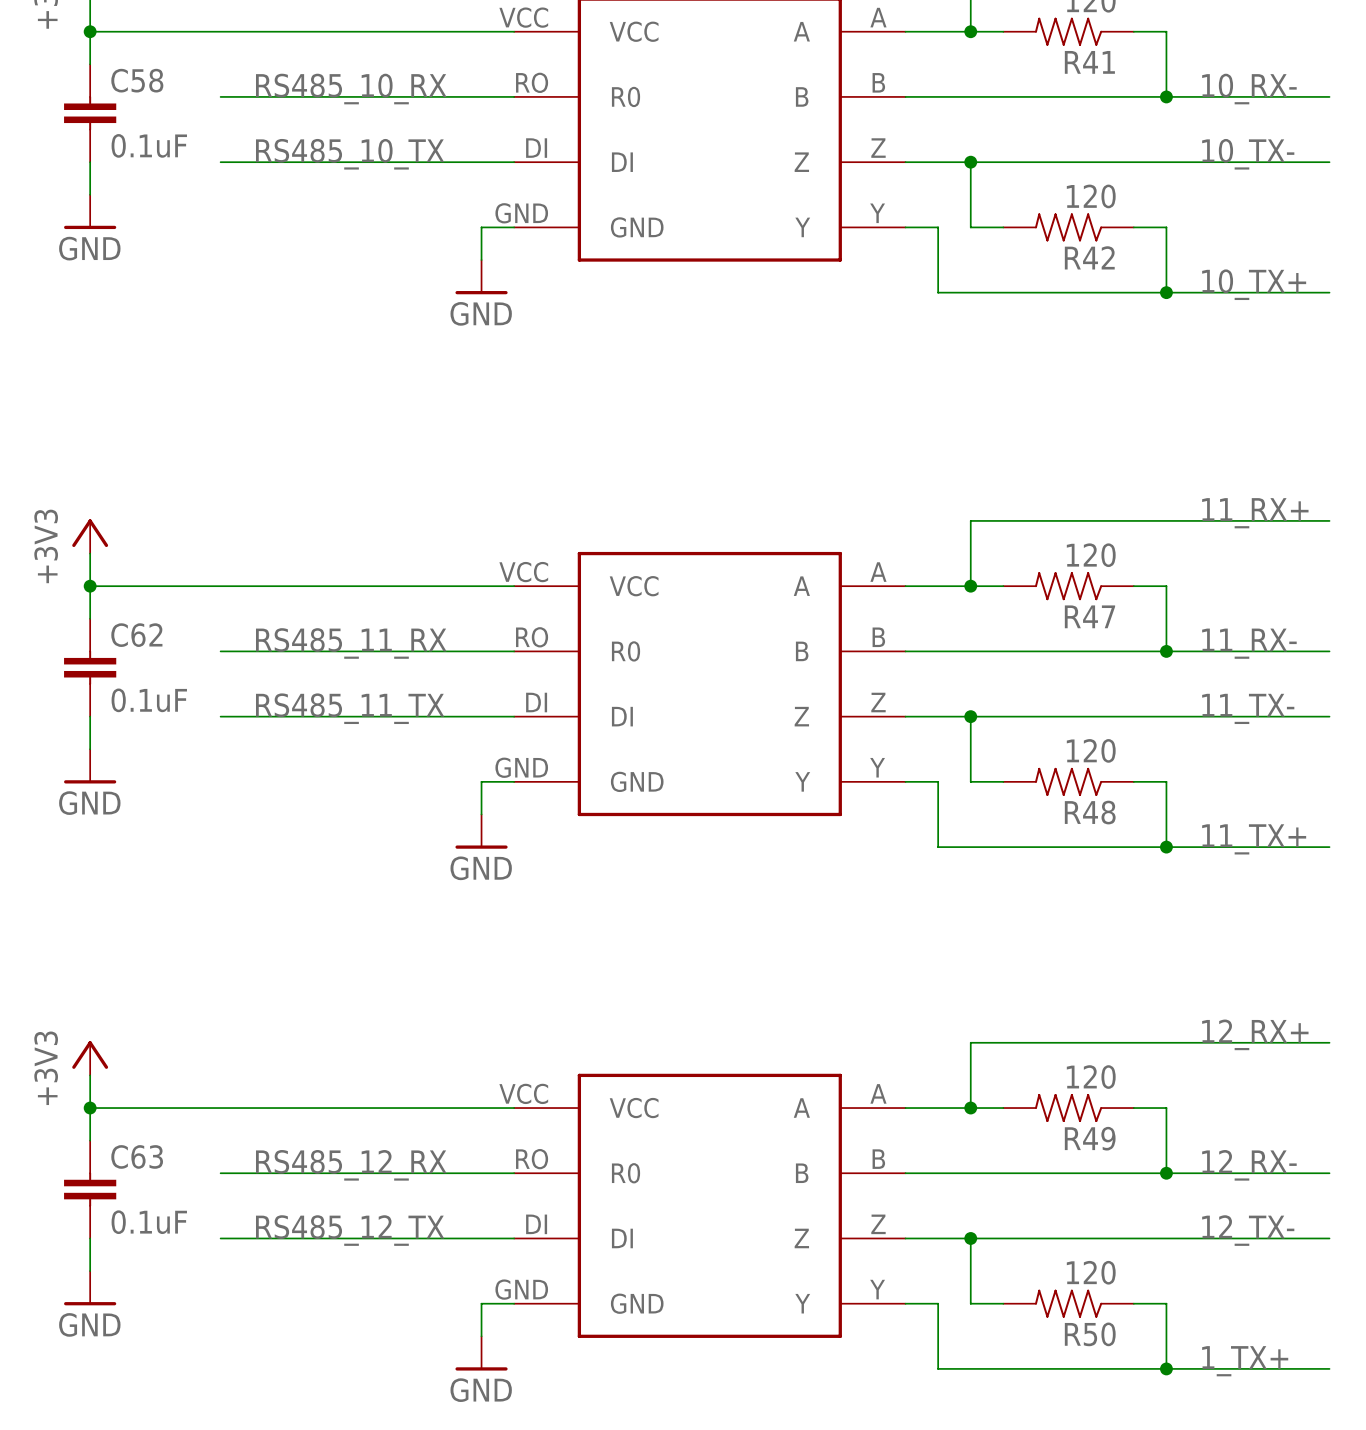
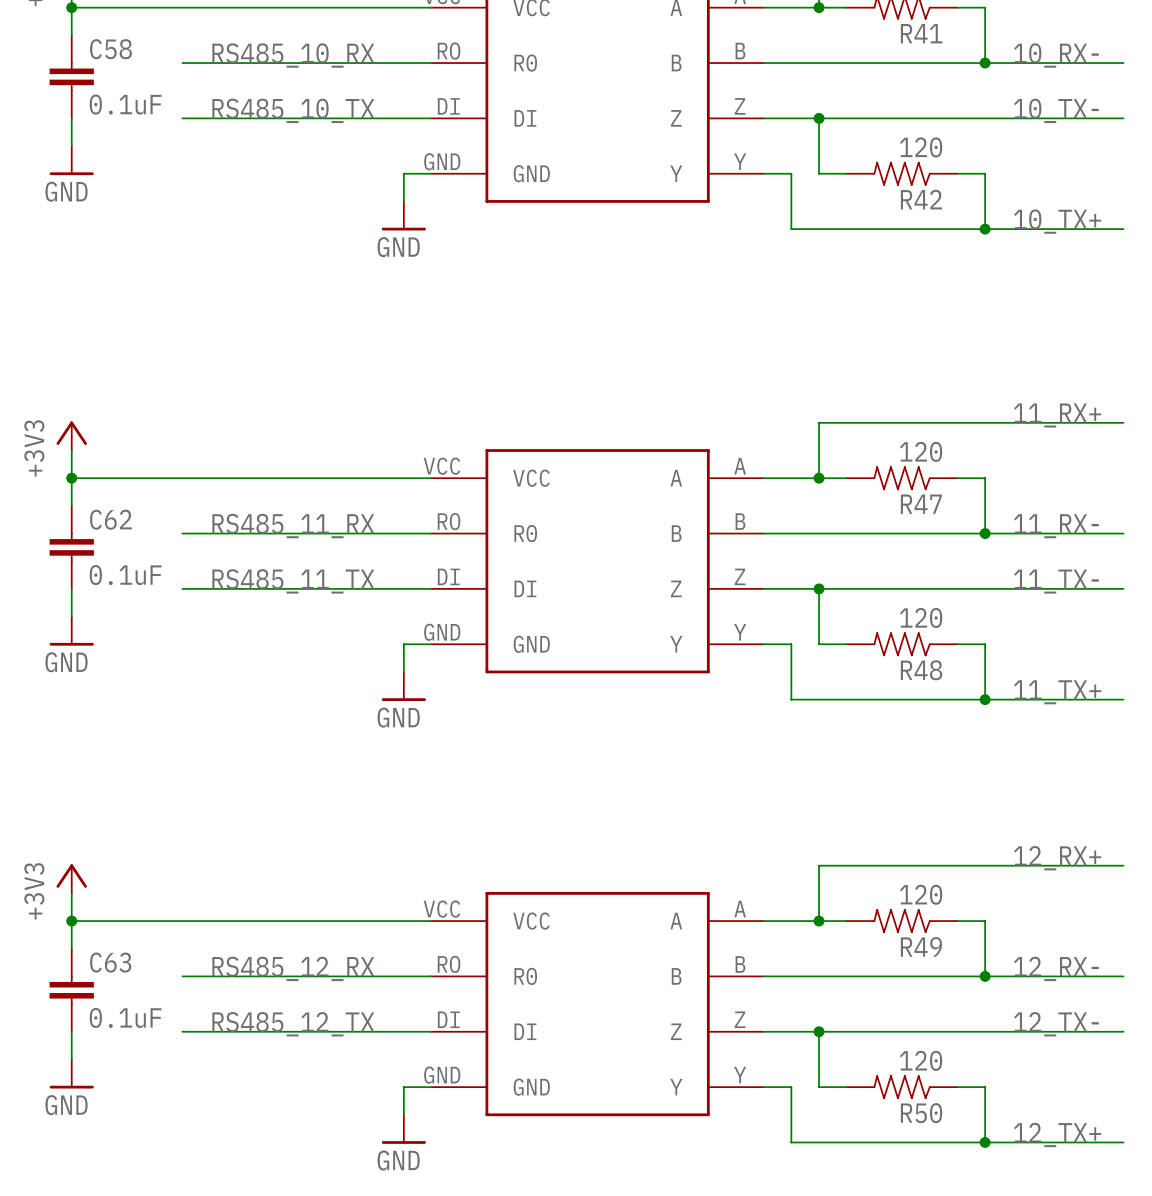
label: 1_TX+ (1245, 1361) -> 12_TX+ (1057, 1134)

